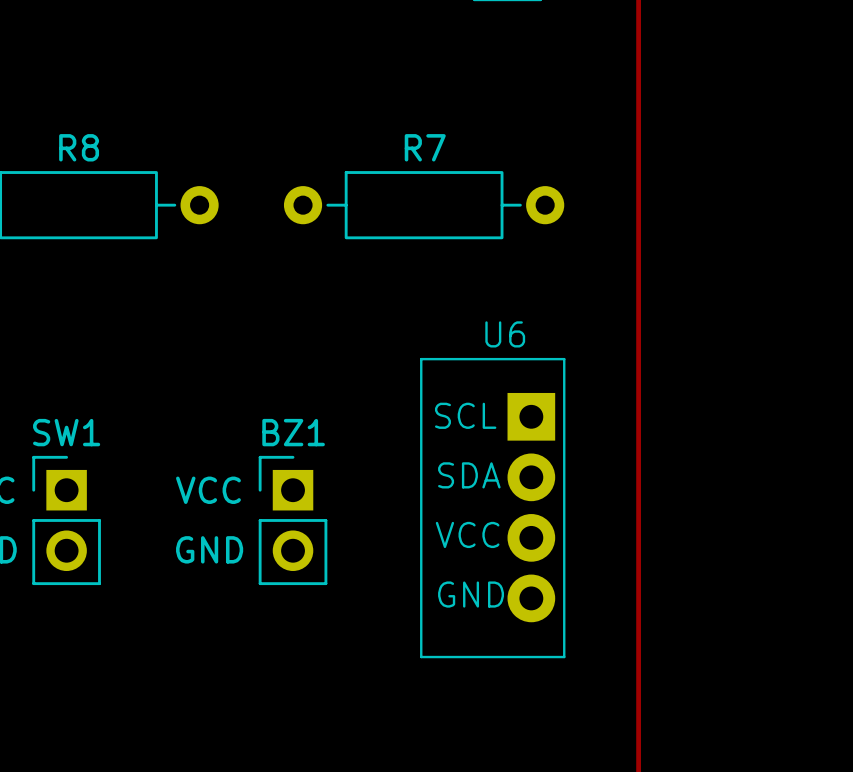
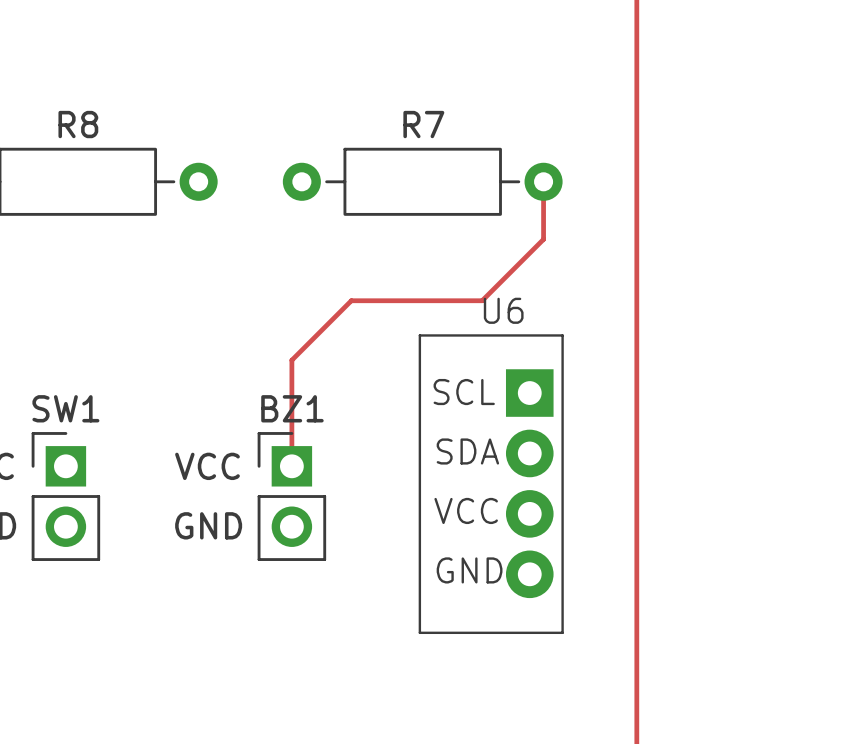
top track: none -> (543, 181) (543, 239) (482, 300) (351, 300) (291, 360) (291, 466)

